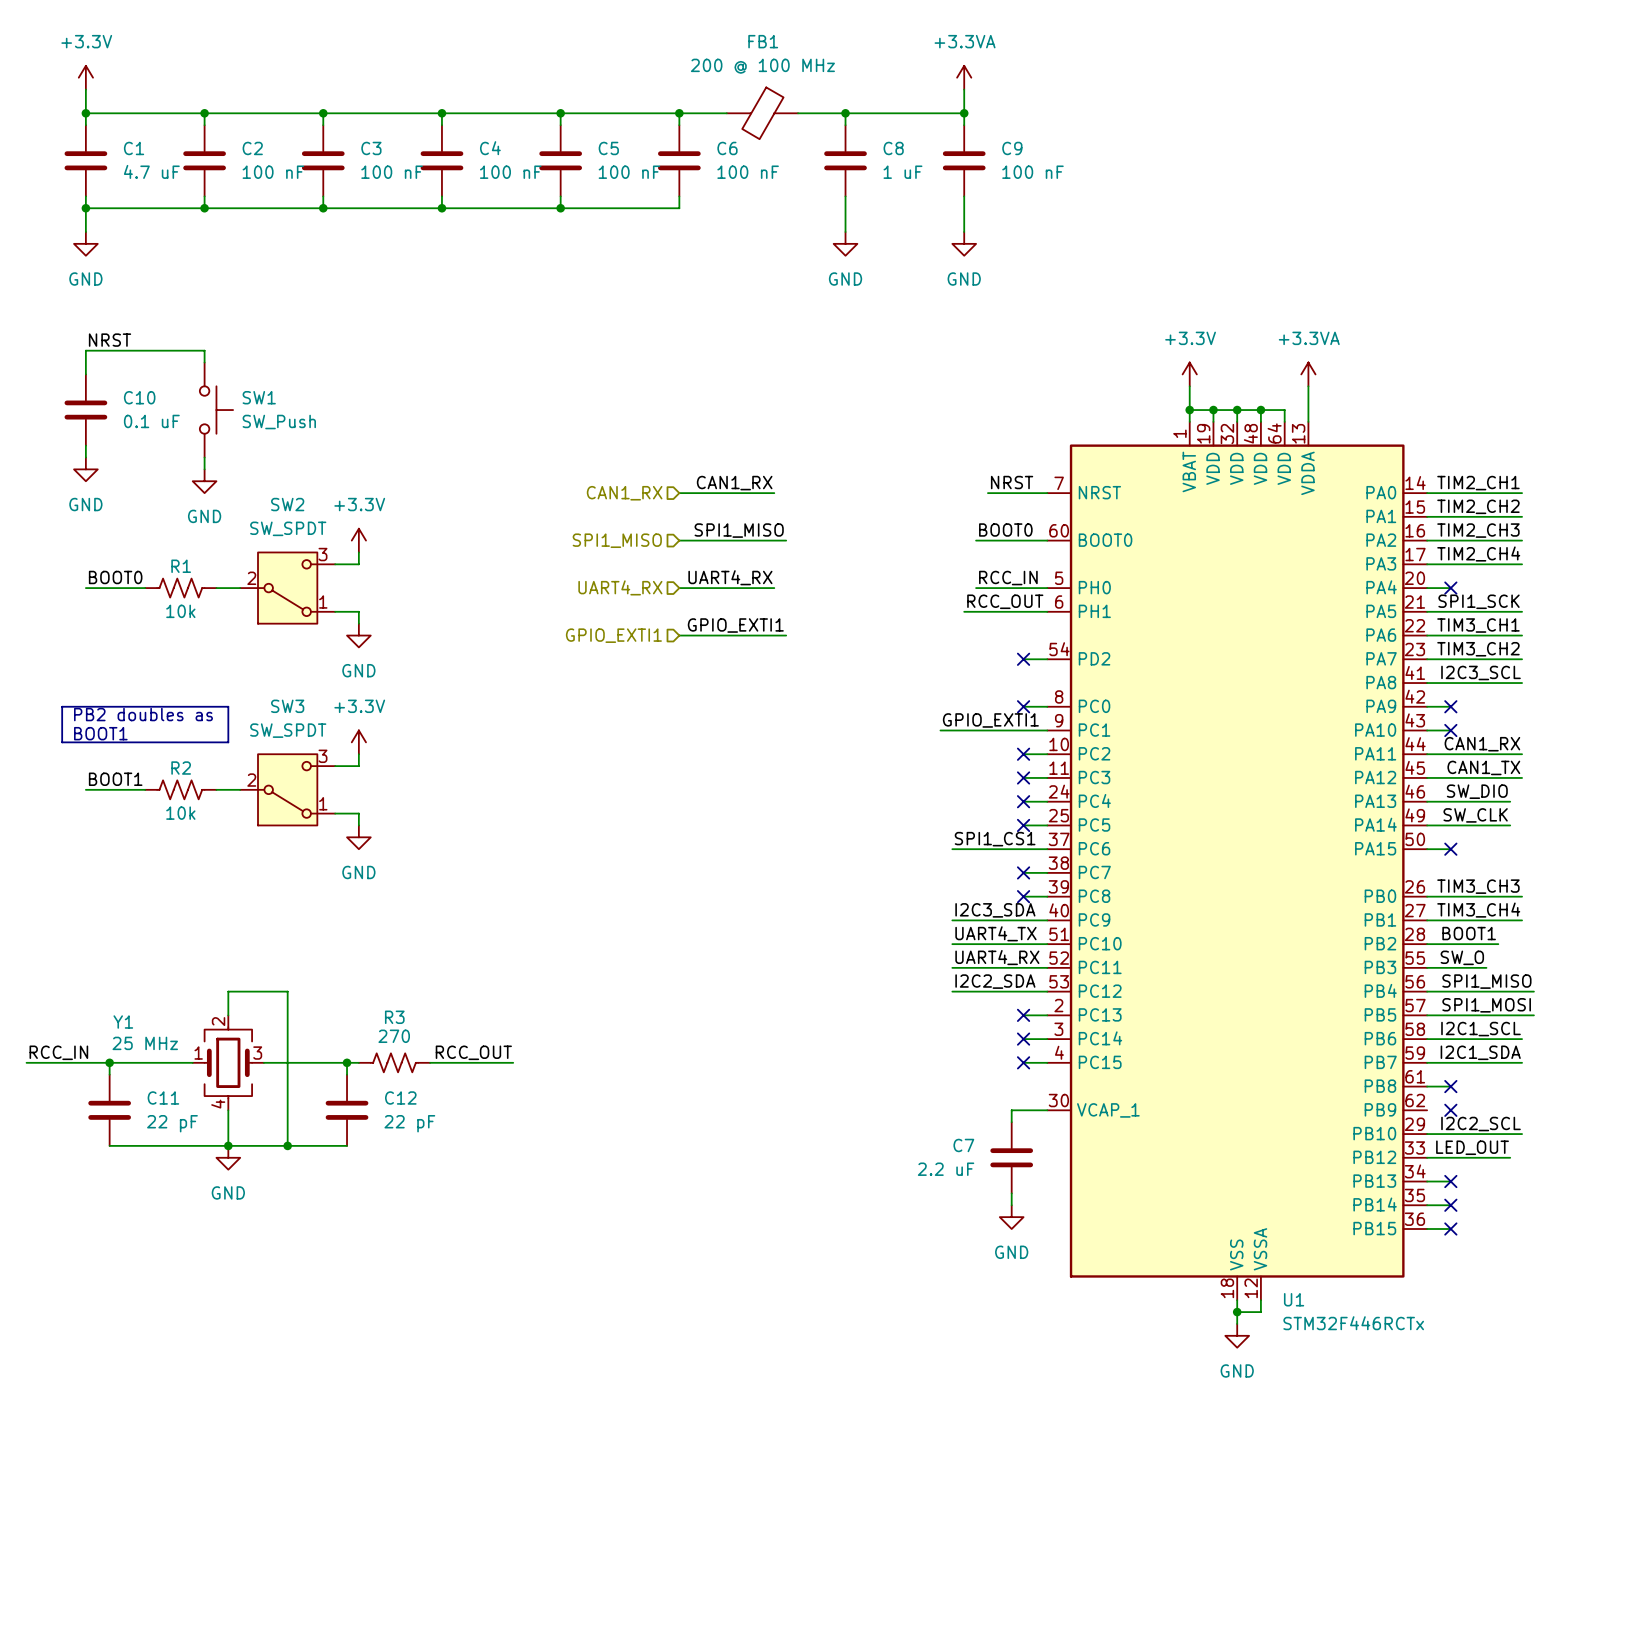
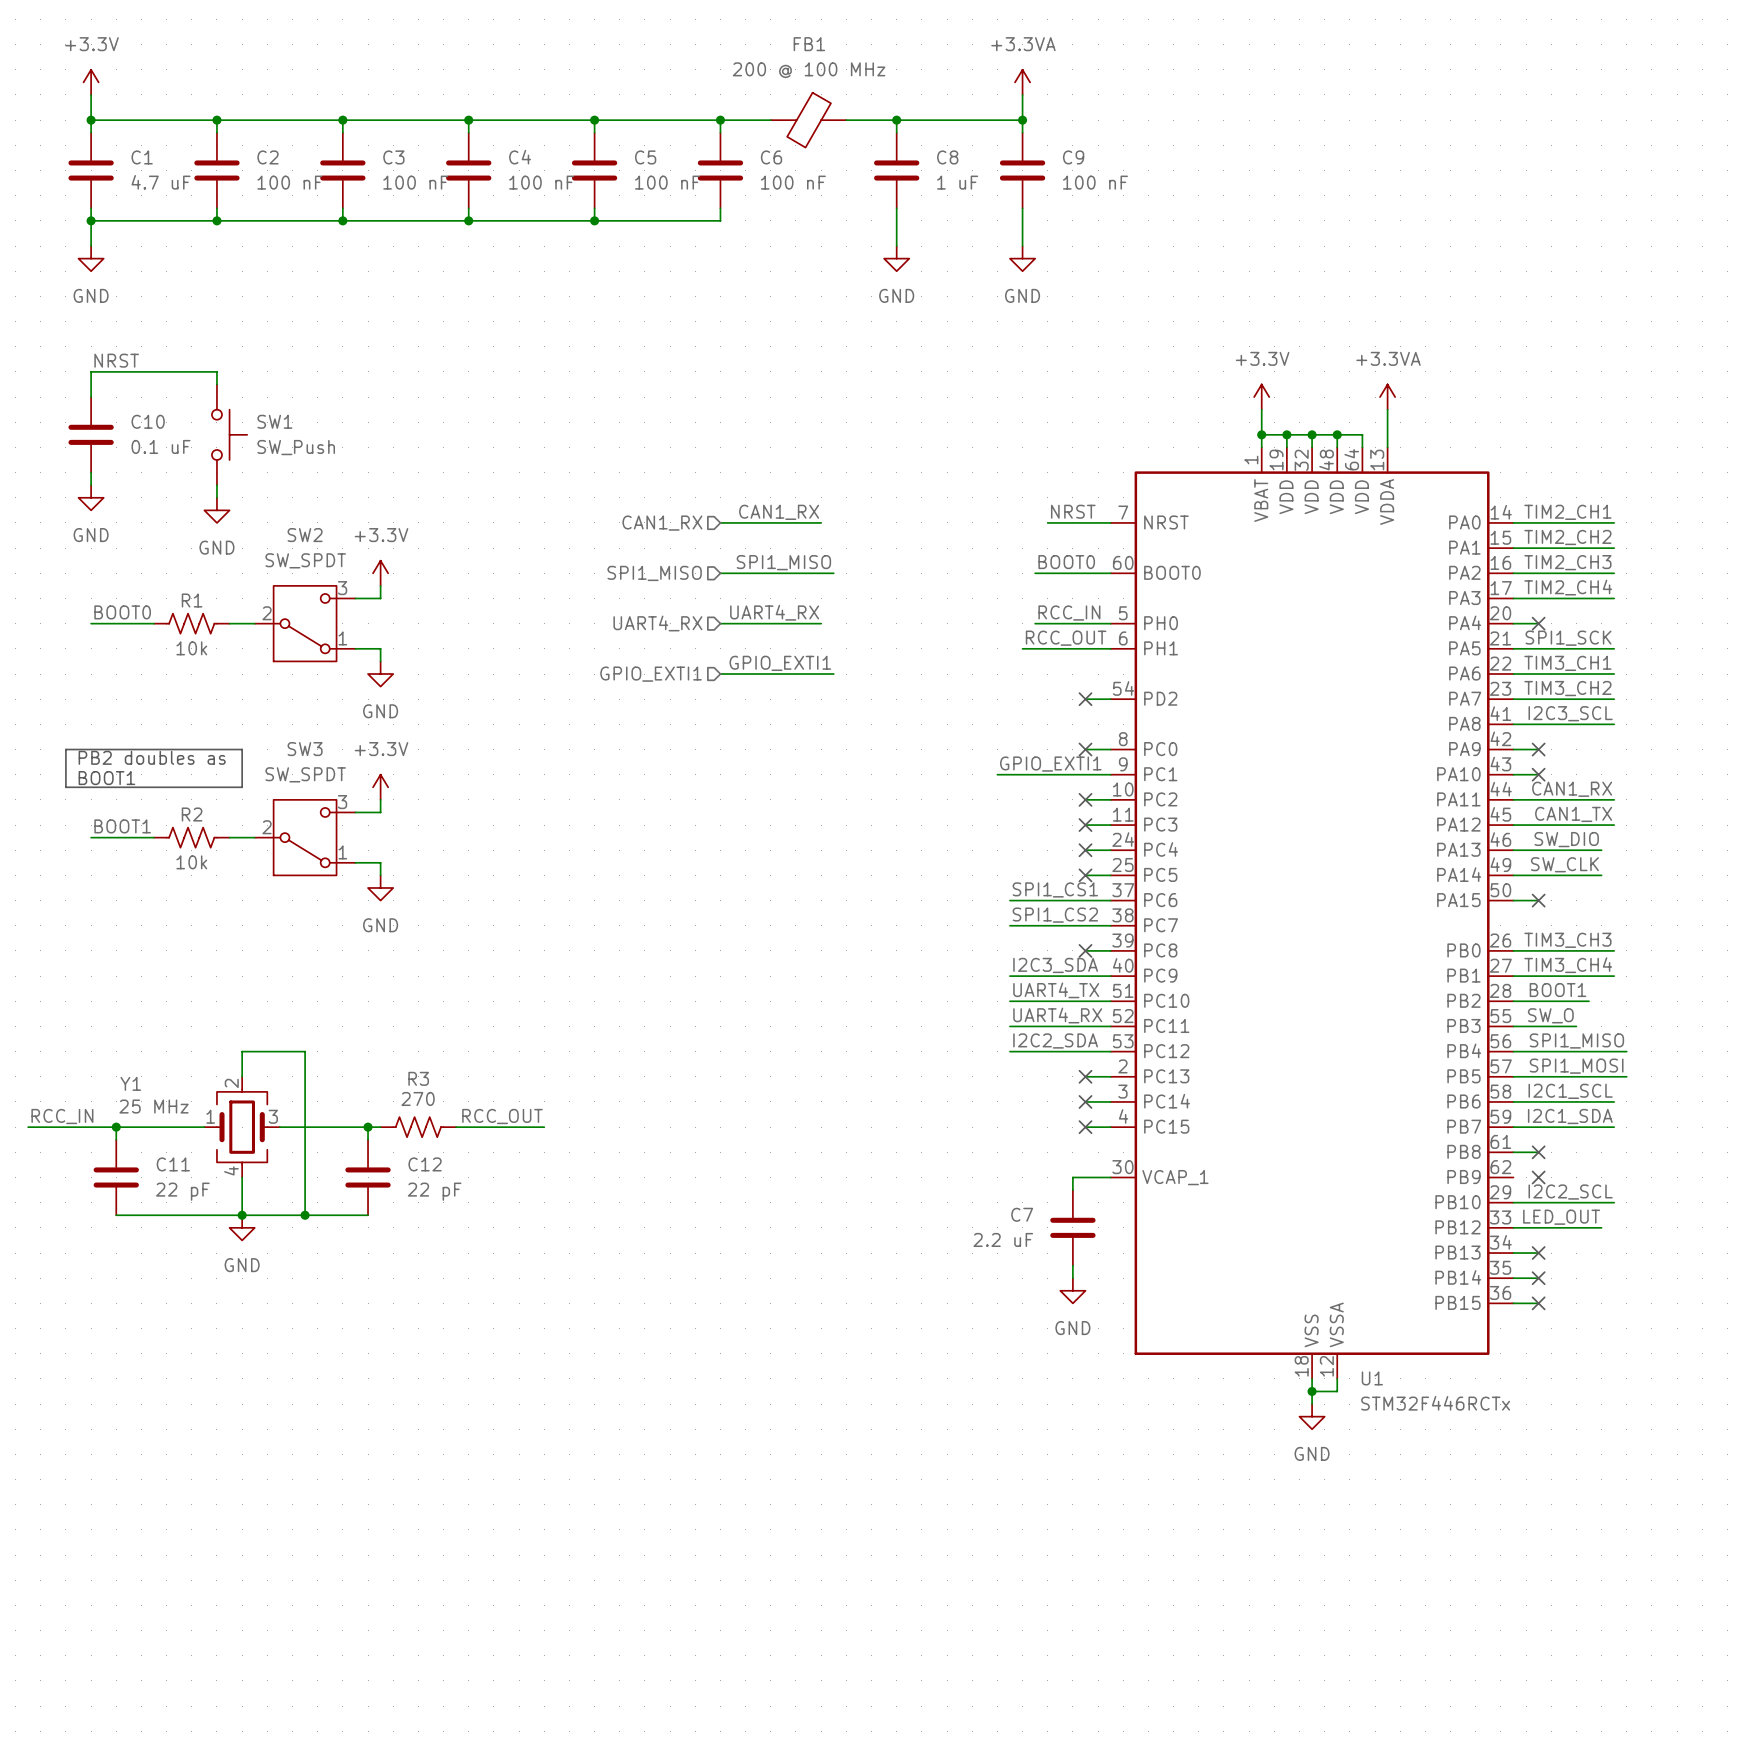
label: none -> SPI1_CS2 (1055, 915)
wire: none -> (1009, 925) (1085, 925)
no-connect mark: (1023, 872) -> none

